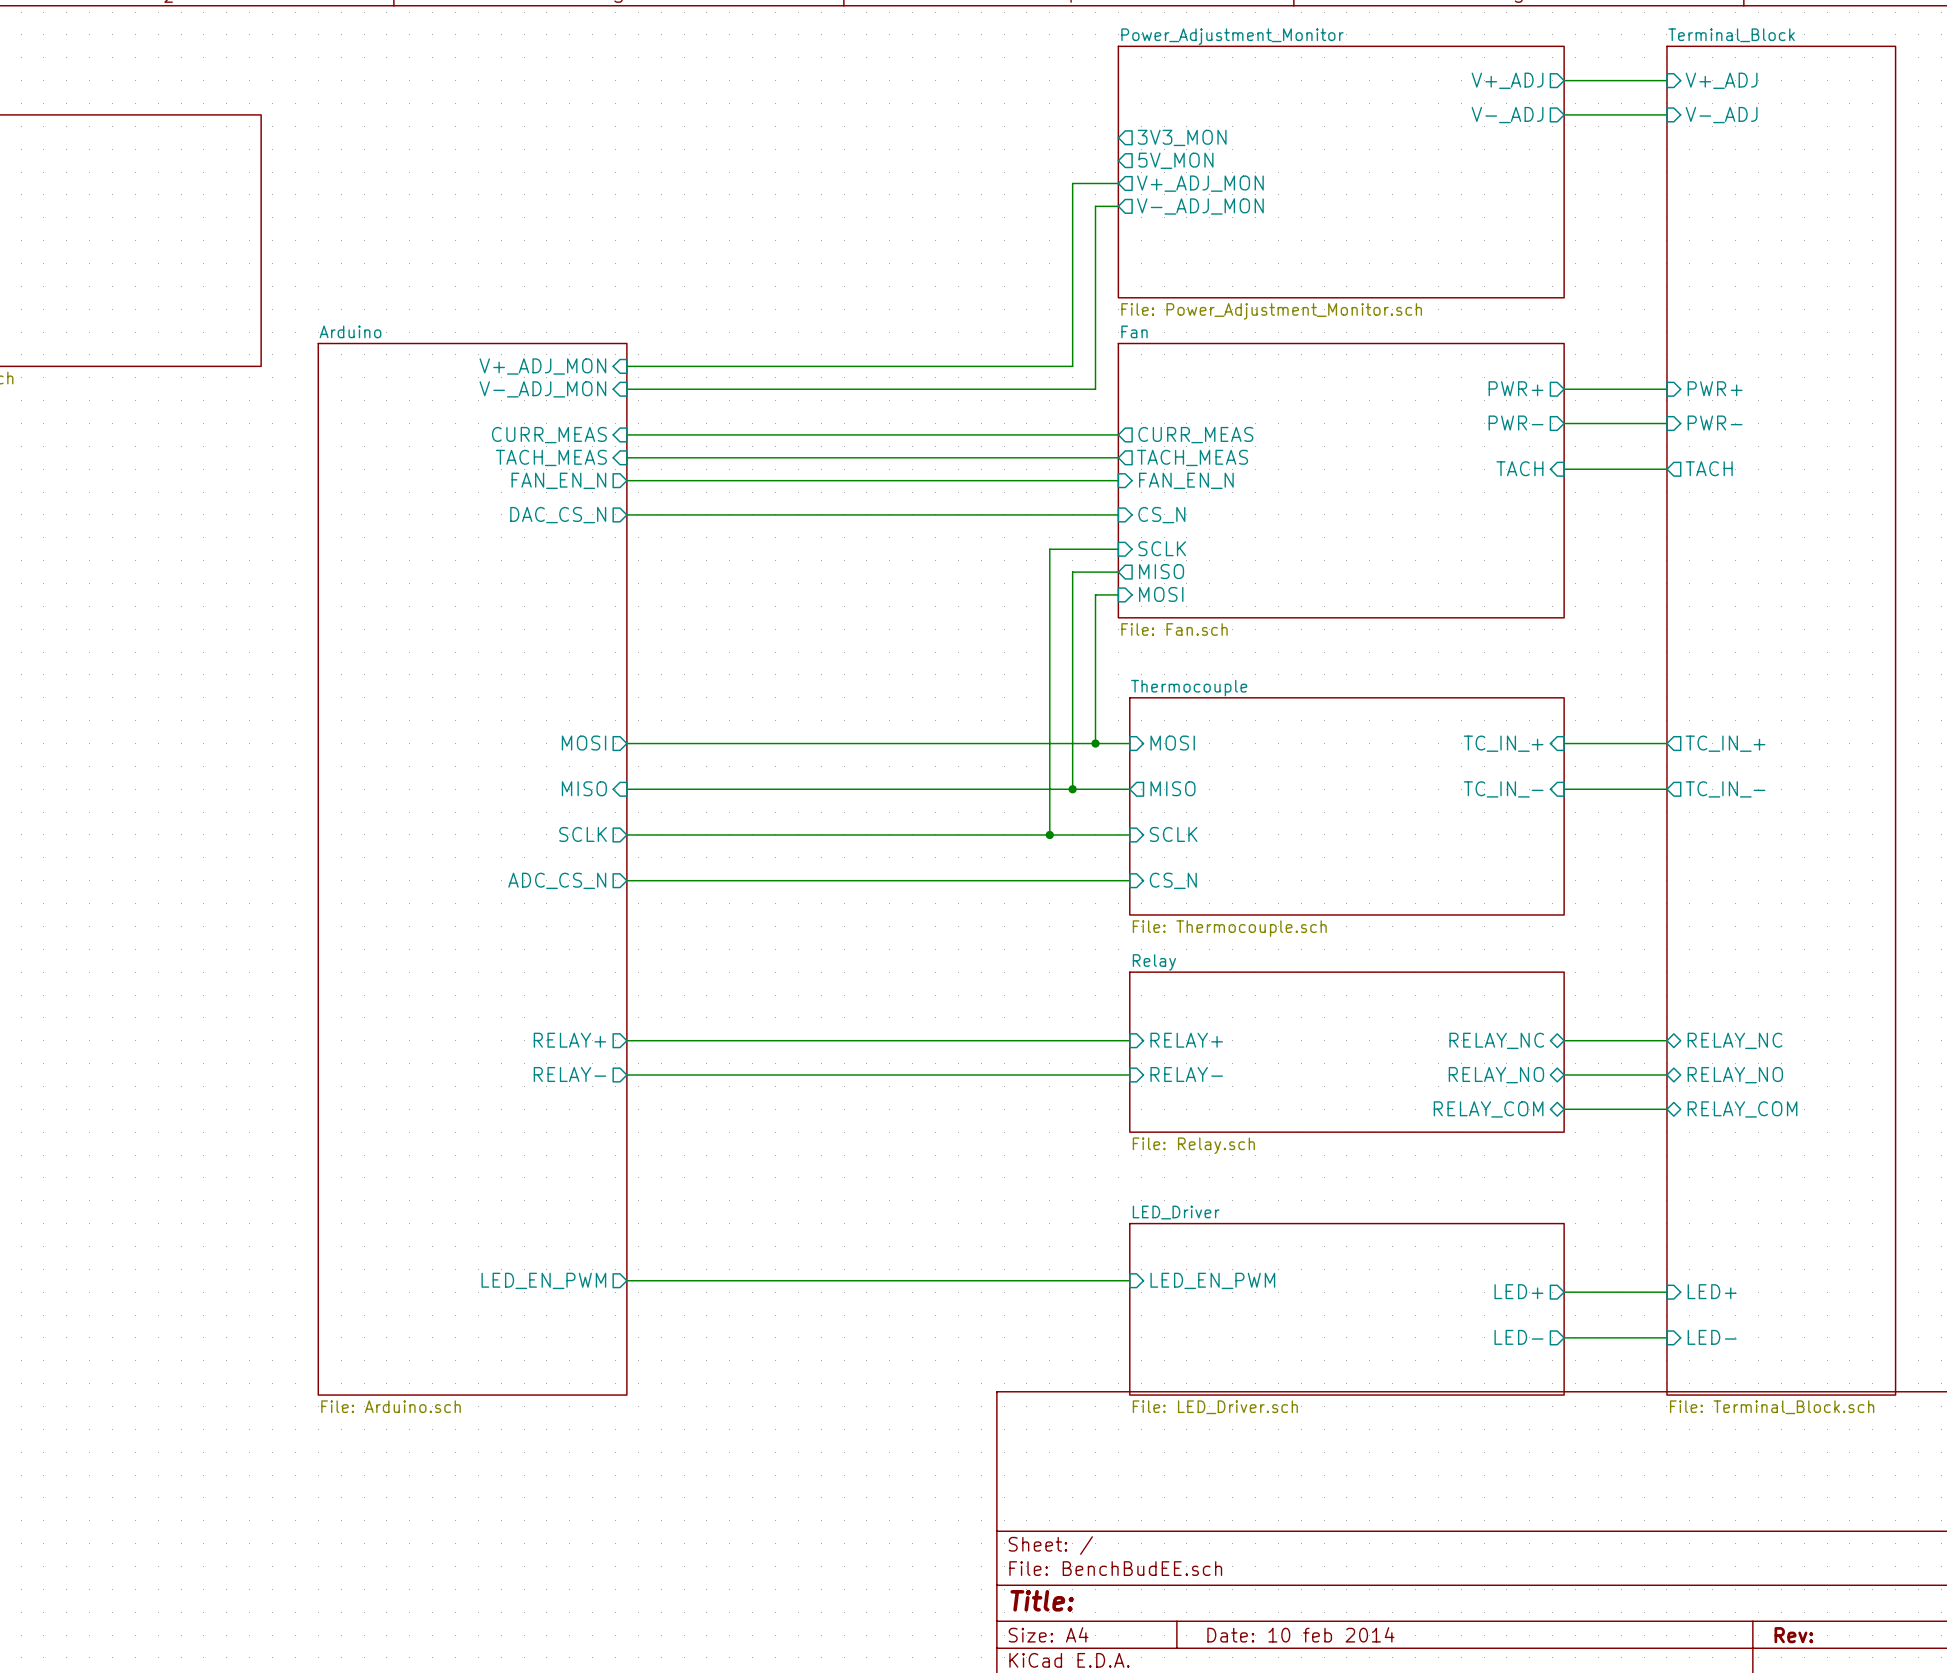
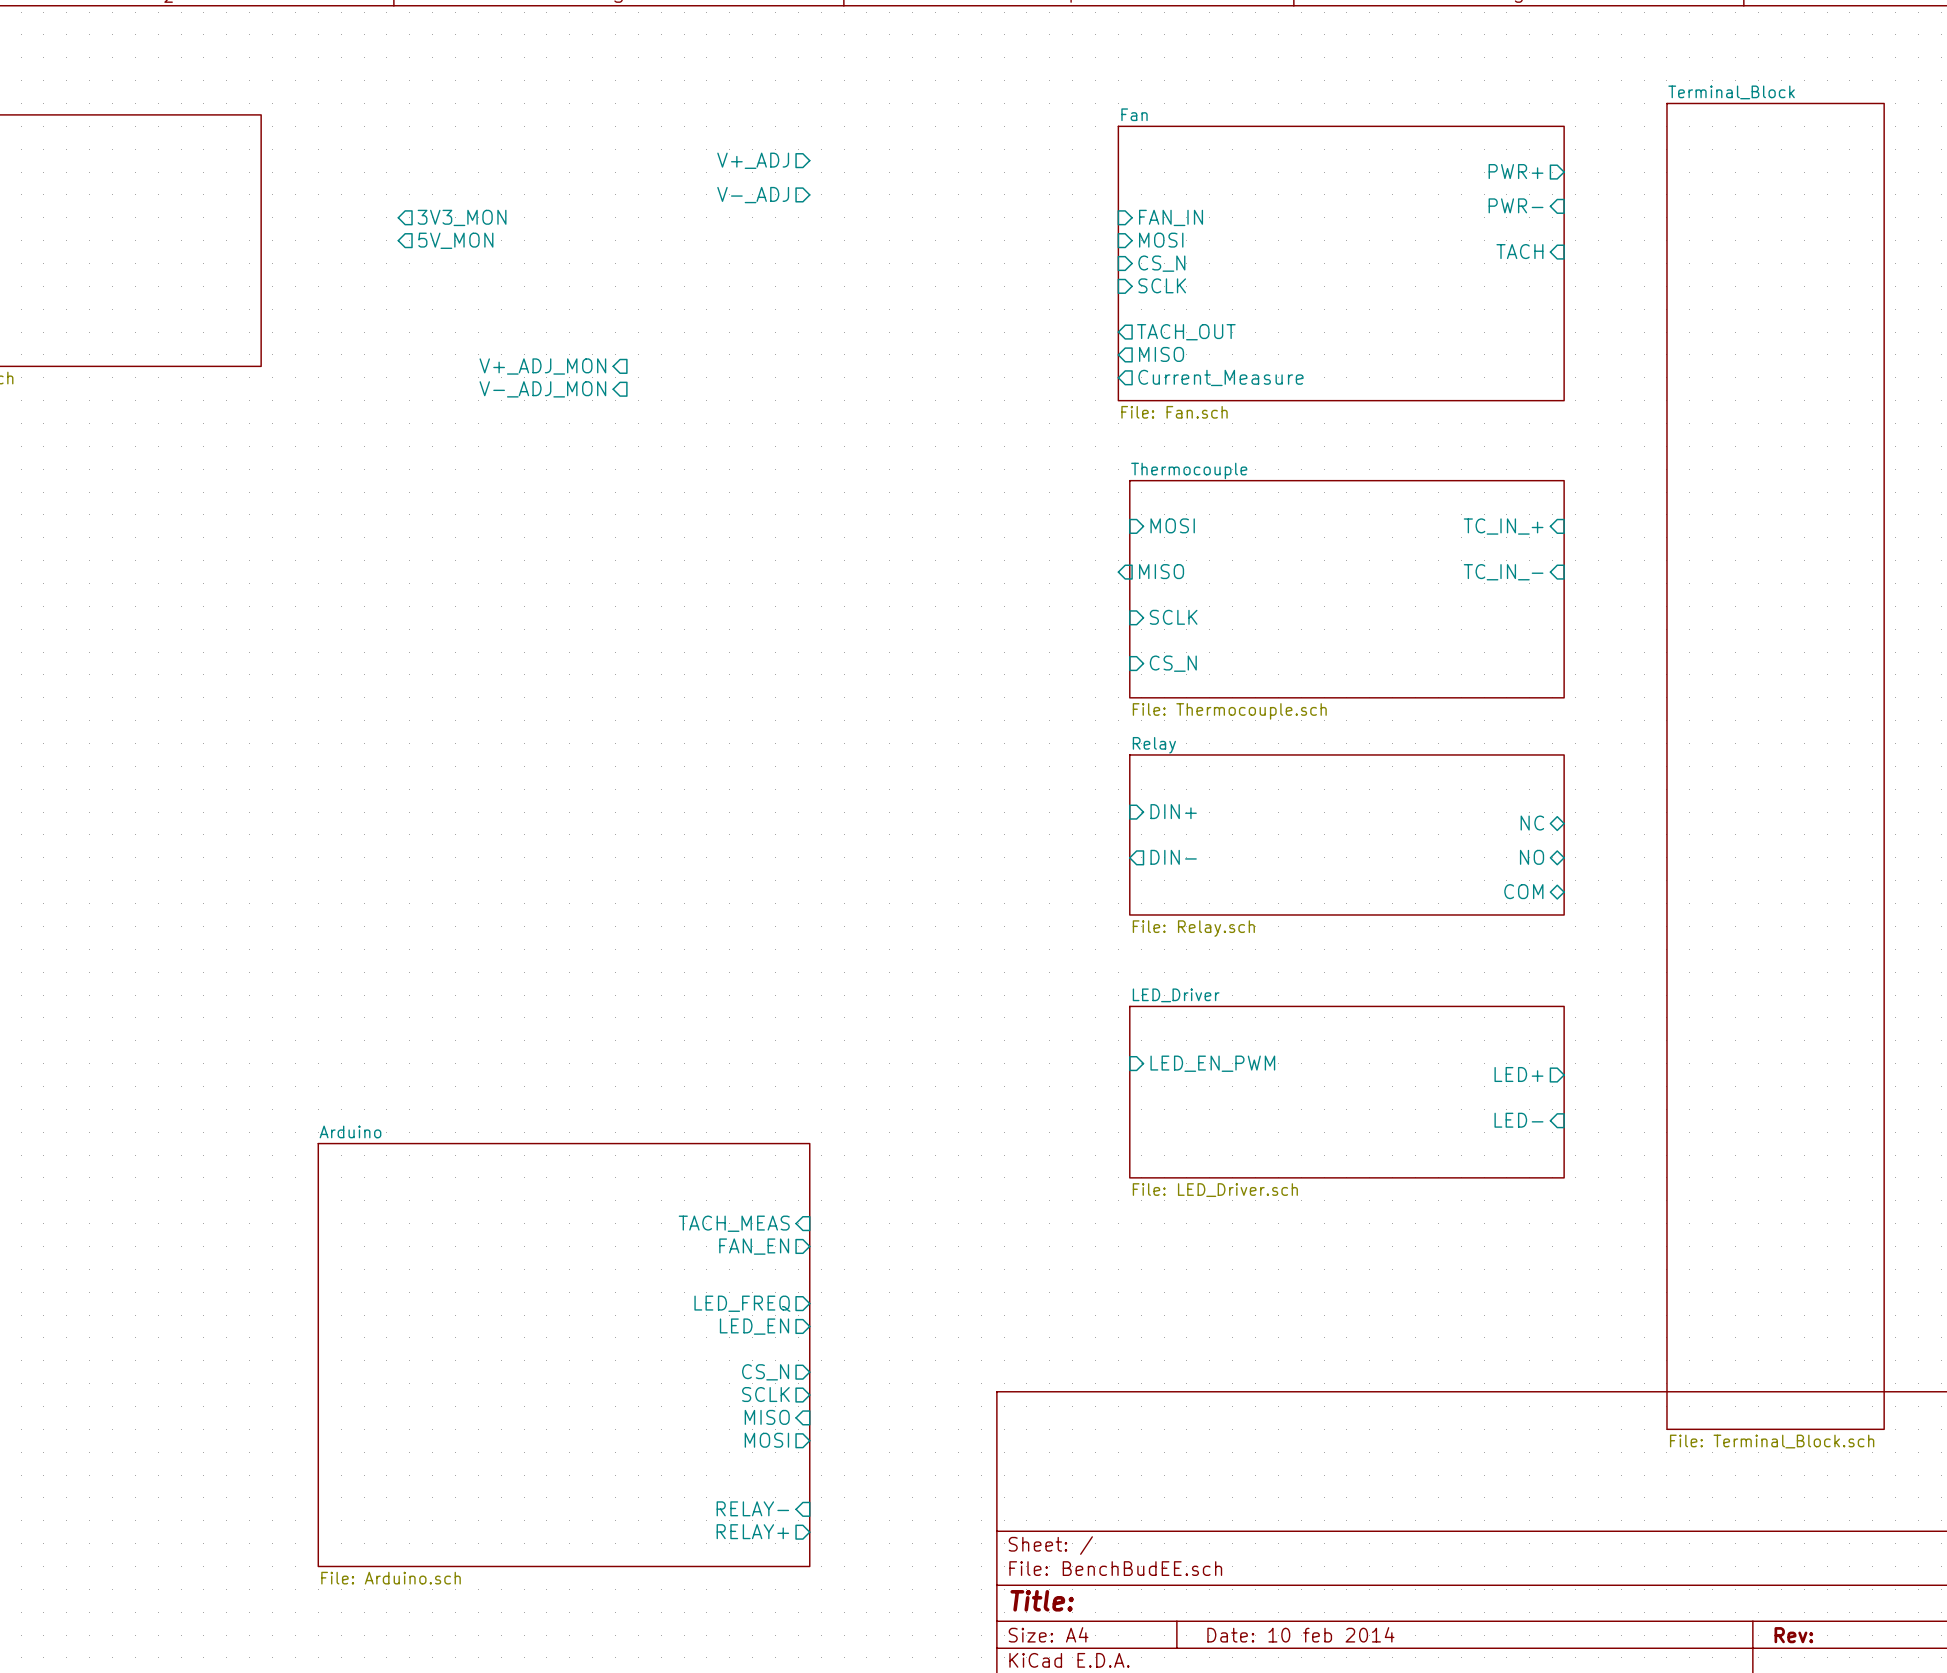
sheet pin: V+_ADJ (1507, 80) -> none
wire: (1564, 80) (1666, 80) -> none
sheet pin: V+_ADJ (1721, 80) -> none
wire: (1564, 114) (1666, 114) -> none
sheet pin: V-_ADJ (1507, 115) -> none
sheet pin: V-_ADJ (1721, 115) -> none
sheet pin: 3V3_MON (1182, 137) -> none
sheet pin: none -> V+_ADJ (753, 160)
sheet pin: 5V_MON (1175, 160) -> none
sheet pin: none -> PWR+ (1516, 171)
sheet Power_Adjustment_Monitor: File: Power_Adjustment_Monitor.sch (1341, 172) -> none
wire: (1118, 183) (1072, 183) (1072, 366) (626, 366) -> none
sheet pin: V+_ADJ_MON (1200, 183) -> none
sheet pin: none -> V-_ADJ (753, 195)
sheet pin: none -> PWR- (1516, 205)
wire: (1118, 206) (1095, 206) (1095, 389) (626, 389) -> none
sheet pin: V-_ADJ_MON (1200, 206) -> none
sheet pin: none -> 3V3_MON (462, 217)
sheet pin: none -> FAN_IN (1171, 217)
sheet pin: none -> 5V_MON (455, 240)
sheet pin: none -> MOSI (1161, 240)
sheet pin: none -> TACH (1519, 251)
sheet pin: none -> CS_N (1161, 263)
sheet pin: none -> SCLK (1162, 285)
sheet pin: none -> TACH_OUT (1186, 332)
sheet pin: none -> MISO (1161, 354)
sheet pin: none -> Current_Measure (1220, 377)
sheet pin: PWR+ (1516, 388) -> none
sheet pin: PWR+ (1715, 388) -> none
wire: (1564, 389) (1666, 389) -> none
sheet pin: PWR- (1516, 423) -> none
wire: (1564, 423) (1666, 423) -> none
sheet pin: PWR- (1715, 423) -> none
wire: (626, 434) (1118, 434) -> none
sheet pin: CURR_MEAS (549, 435) -> none
sheet pin: CURR_MEAS (1195, 435) -> none
sheet pin: TACH_MEAS (551, 457) -> none
wire: (626, 457) (1118, 457) -> none
sheet pin: TACH_MEAS (1192, 457) -> none
sheet pin: TACH (1519, 468) -> none
sheet pin: TACH (1709, 468) -> none
wire: (1564, 469) (1666, 469) -> none
sheet pin: FAN_EN_N (558, 480) -> none
wire: (626, 480) (1118, 480) -> none
sheet pin: FAN_EN_N (1186, 480) -> none
sheet Fan position: (1341, 480) -> (1341, 263)
wire: (626, 514) (1118, 514) -> none
sheet pin: DAC_CS_N (558, 515) -> none
sheet pin: CS_N (1161, 515) -> none
sheet pin: none -> TC_IN_+ (1503, 526)
sheet pin position: SCLK (1162, 548) -> SCLK (1173, 617)
wire: (1118, 549) (1049, 549) (1049, 834) -> none
wire: (1118, 572) (1072, 572) (1072, 789) -> none
sheet pin: none -> TC_IN_- (1503, 572)
wire: (1118, 594) (1095, 594) (1095, 743) -> none
sheet pin position: MOSI (1161, 594) -> MOSI (1172, 525)
sheet pin: none -> CS_N (1173, 663)
sheet Terminal_Block: File: Terminal_Block.sch (1781, 720) -> none
sheet pin: MOSI (584, 743) -> none
wire: (626, 743) (1129, 743) -> none
junction: (1095, 743) -> none
sheet pin: MOSI (1172, 743) -> none
sheet pin: TC_IN_+ (1503, 743) -> none
wire: (1564, 743) (1666, 743) -> none
sheet pin: TC_IN_+ (1725, 743) -> none
sheet Terminal_Block: none -> File: Terminal_Block.sch (1775, 766)
sheet pin: MISO (584, 788) -> none
sheet pin: MISO (1172, 788) -> none
wire: (626, 789) (1129, 789) -> none
junction: (1072, 789) -> none
sheet pin: TC_IN_- (1503, 789) -> none
wire: (1564, 789) (1666, 789) -> none
sheet pin: TC_IN_- (1725, 789) -> none
sheet Thermocouple position: (1346, 806) -> (1346, 589)
sheet pin: none -> DIN+ (1173, 811)
sheet pin: none -> NC (1532, 823)
sheet pin: SCLK (583, 834) -> none
wire: (626, 834) (1129, 834) -> none
junction: (1049, 834) -> none
sheet pin: SCLK (1173, 834) -> none
sheet pin: none -> DIN- (1173, 857)
sheet pin: none -> NO (1532, 857)
sheet Arduino: File: Arduino.sch (472, 869) -> none
sheet pin: ADC_CS_N (557, 880) -> none
wire: (626, 880) (1129, 880) -> none
sheet pin: CS_N (1173, 880) -> none
sheet pin: none -> COM (1523, 891)
sheet pin: RELAY+ (569, 1040) -> none
wire: (626, 1040) (1129, 1040) -> none
sheet pin: RELAY+ (1186, 1040) -> none
sheet pin: RELAY_NC (1496, 1040) -> none
wire: (1564, 1040) (1666, 1040) -> none
sheet pin: RELAY_NC (1735, 1040) -> none
sheet Relay position: (1346, 1052) -> (1346, 834)
sheet pin: RELAY- (569, 1074) -> none
sheet pin: RELAY- (1186, 1074) -> none
wire: (626, 1075) (1129, 1075) -> none
sheet pin shape: bidirectional (1496, 1075) -> output (1518, 1074)
sheet pin: RELAY_NO (1496, 1075) -> LED+ (1518, 1074)
wire: (1564, 1075) (1666, 1075) -> none
sheet pin: RELAY_NO (1735, 1075) -> none
sheet pin: RELAY_COM (1488, 1109) -> none
wire: (1564, 1109) (1666, 1109) -> none
sheet pin: RELAY_COM (1742, 1109) -> none
sheet pin: none -> LED- (1518, 1120)
sheet pin: none -> TACH_MEAS (734, 1223)
sheet pin: none -> FAN_EN (754, 1246)
sheet pin: LED_EN_PWM (543, 1280) -> none
wire: (626, 1280) (1129, 1280) -> none
sheet pin position: LED_EN_PWM (1212, 1280) -> LED_EN_PWM (1212, 1063)
sheet pin: LED+ (1518, 1291) -> none
sheet pin: LED+ (1712, 1291) -> none
wire: (1564, 1292) (1666, 1292) -> none
sheet pin: none -> LED_FREQ (742, 1303)
sheet LED_Driver position: (1346, 1309) -> (1346, 1092)
sheet pin: none -> LED_EN (754, 1326)
sheet pin: LED- (1518, 1337) -> none
wire: (1564, 1337) (1666, 1337) -> none
sheet pin: LED- (1712, 1337) -> none
sheet Arduino: none -> File: Arduino.sch (564, 1355)
sheet pin: none -> CS_N (765, 1372)
sheet pin: none -> SCLK (765, 1394)
sheet pin: none -> MISO (767, 1417)
sheet pin: none -> MOSI (766, 1440)
sheet pin: none -> RELAY- (752, 1508)
sheet pin: none -> RELAY+ (752, 1531)

